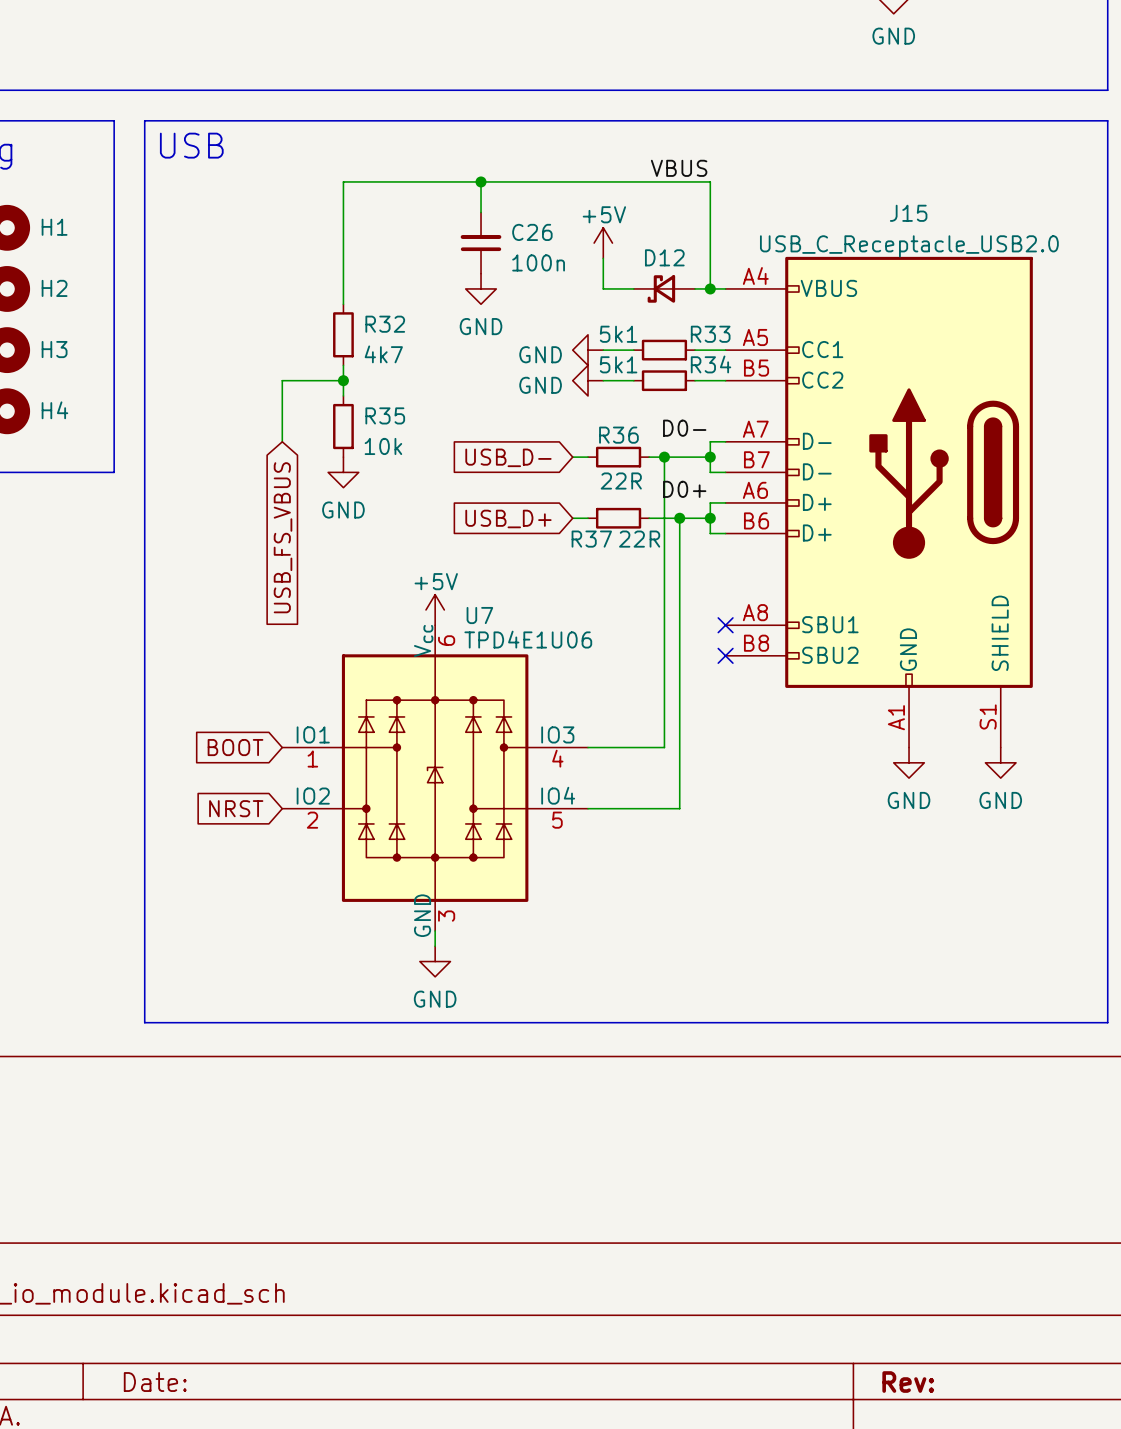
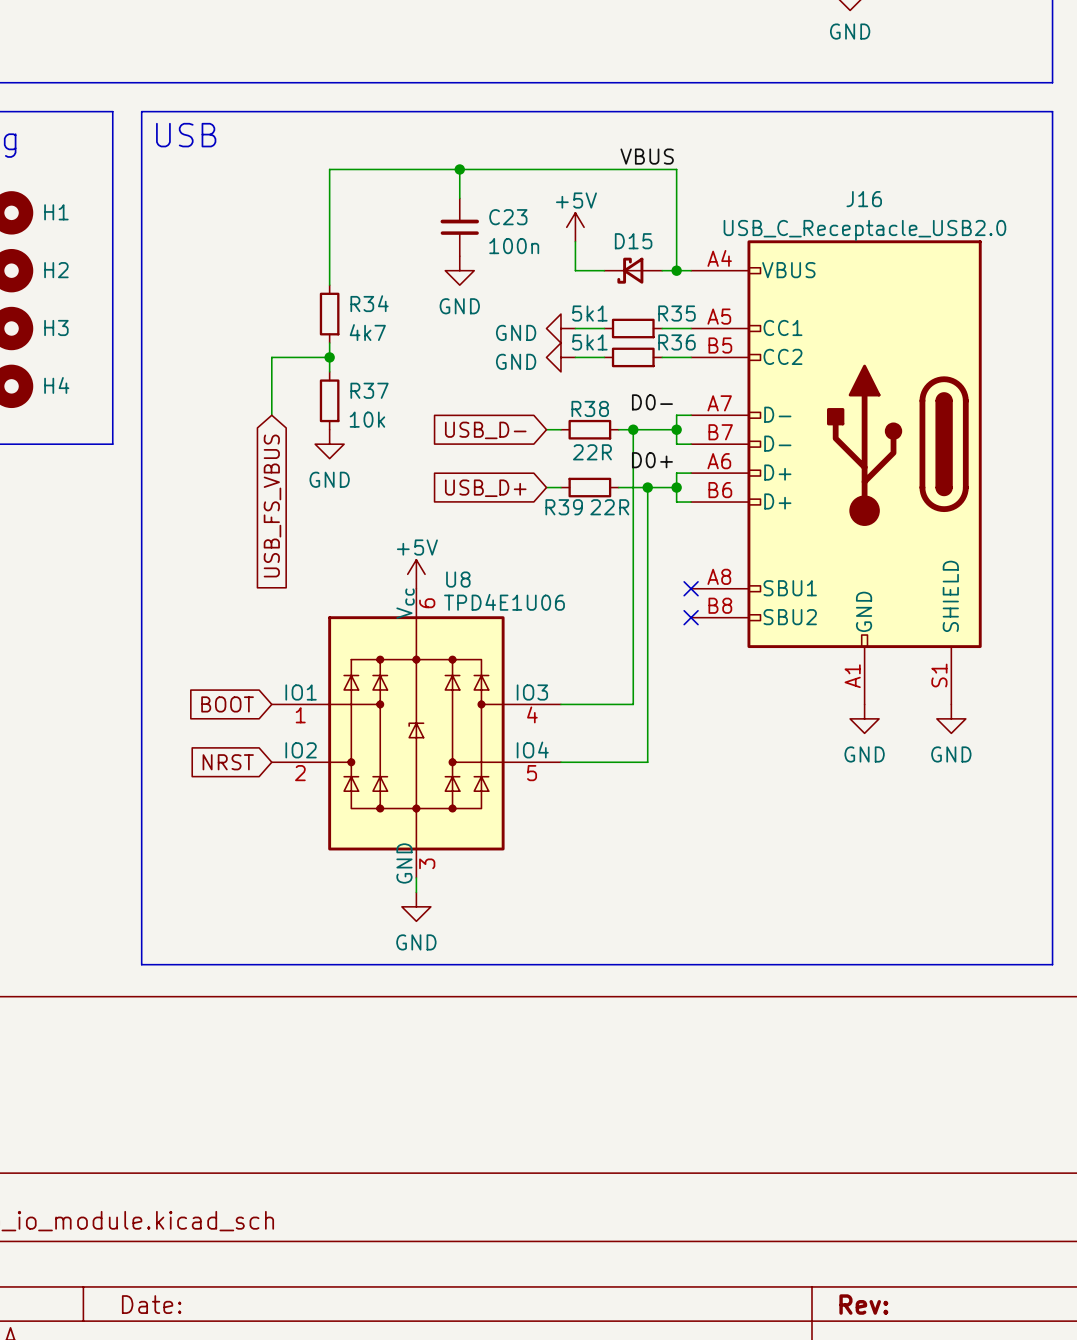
J15 name: J15 (908, 213) -> J16 (864, 199)
C26 name: C26 (532, 232) -> C23 (508, 217)
D12 name: D12 (664, 257) -> D15 (633, 241)
R32 name: R32 (385, 324) -> R34 (369, 303)
R33 name: R33 (710, 334) -> R35 (676, 313)
R34 name: R34 (711, 364) -> R36 (676, 342)
R35 name: R35 (385, 415) -> R37 (369, 390)
R36 name: R36 (618, 435) -> R38 (590, 408)
R37 name: R37 (591, 539) -> R39 (564, 507)
U7 name: U7 (479, 615) -> U8 (458, 579)

